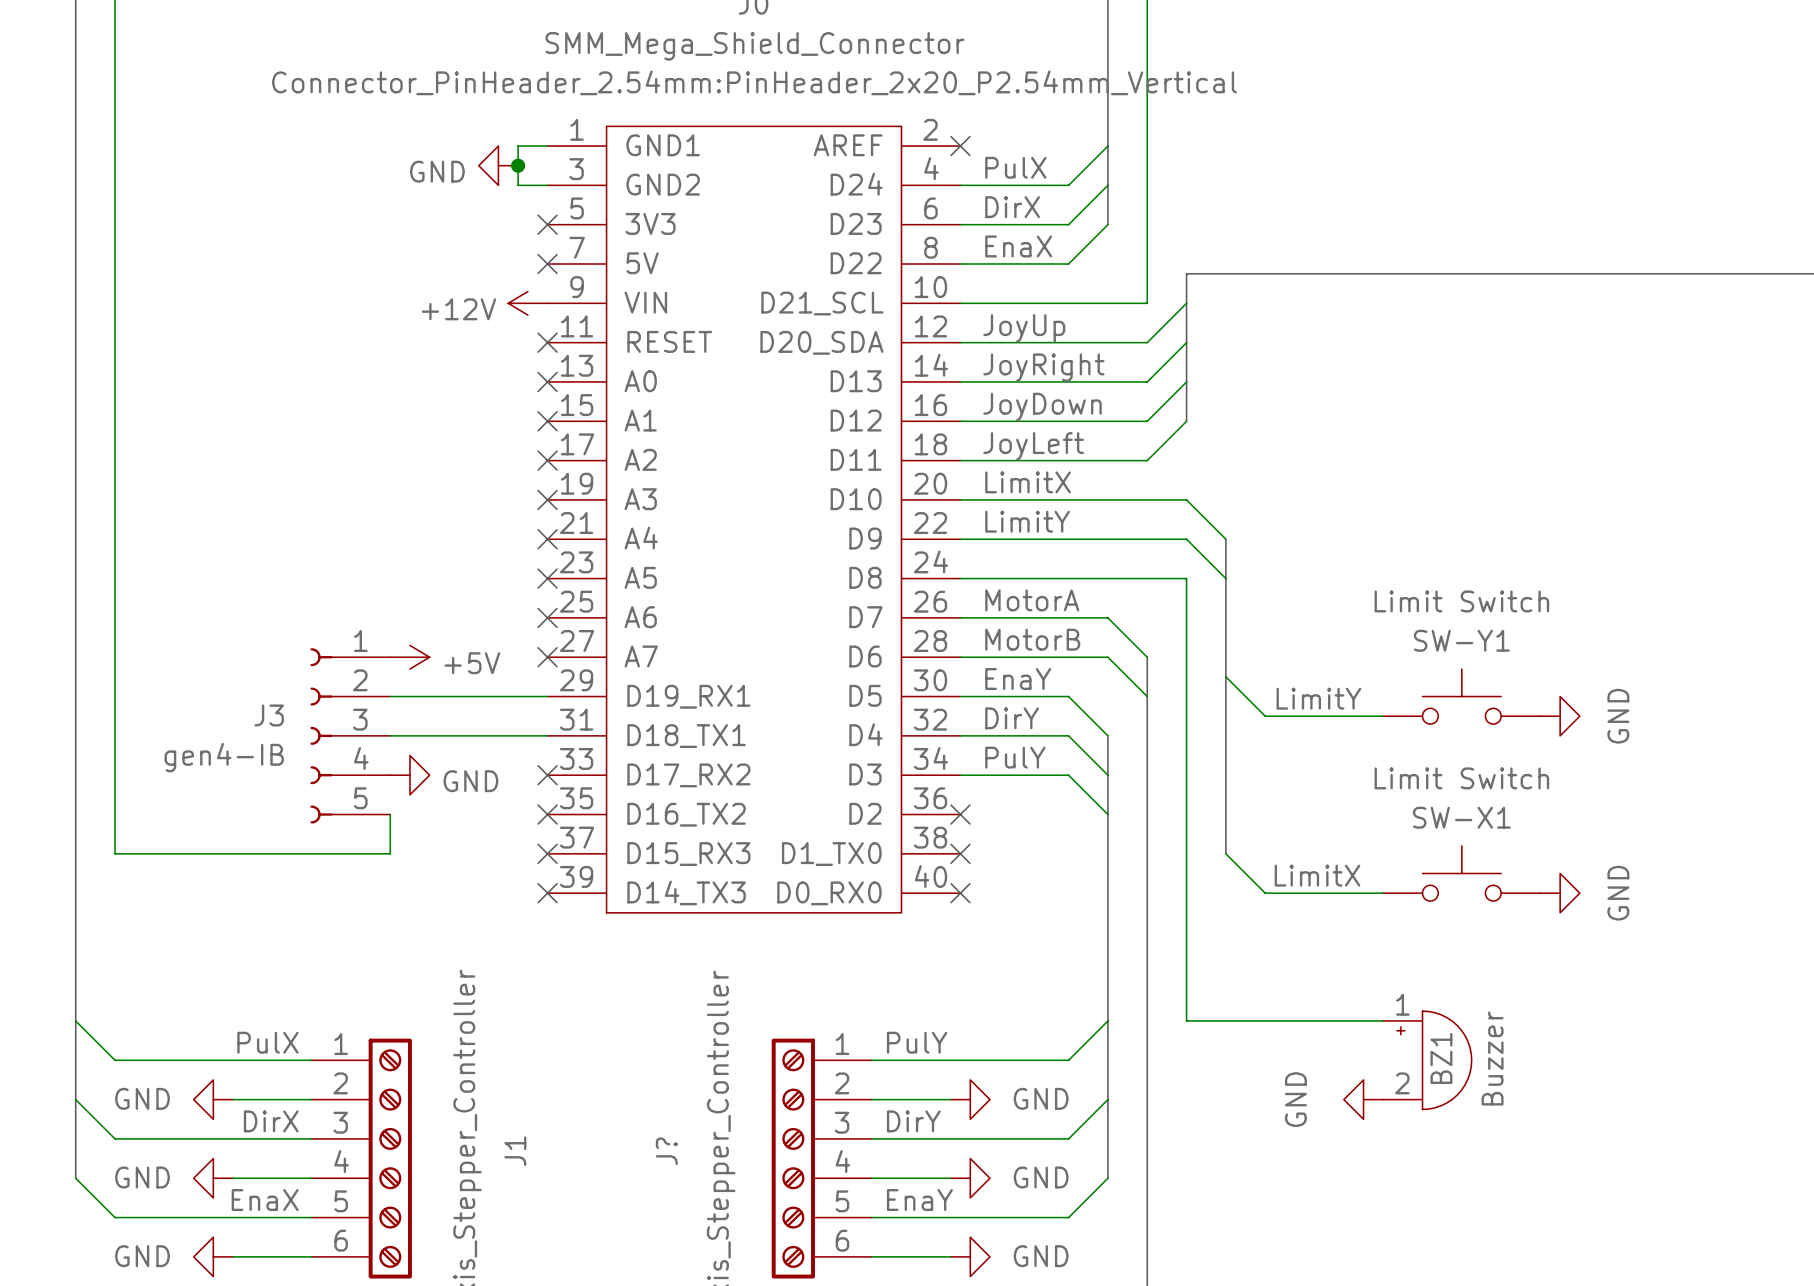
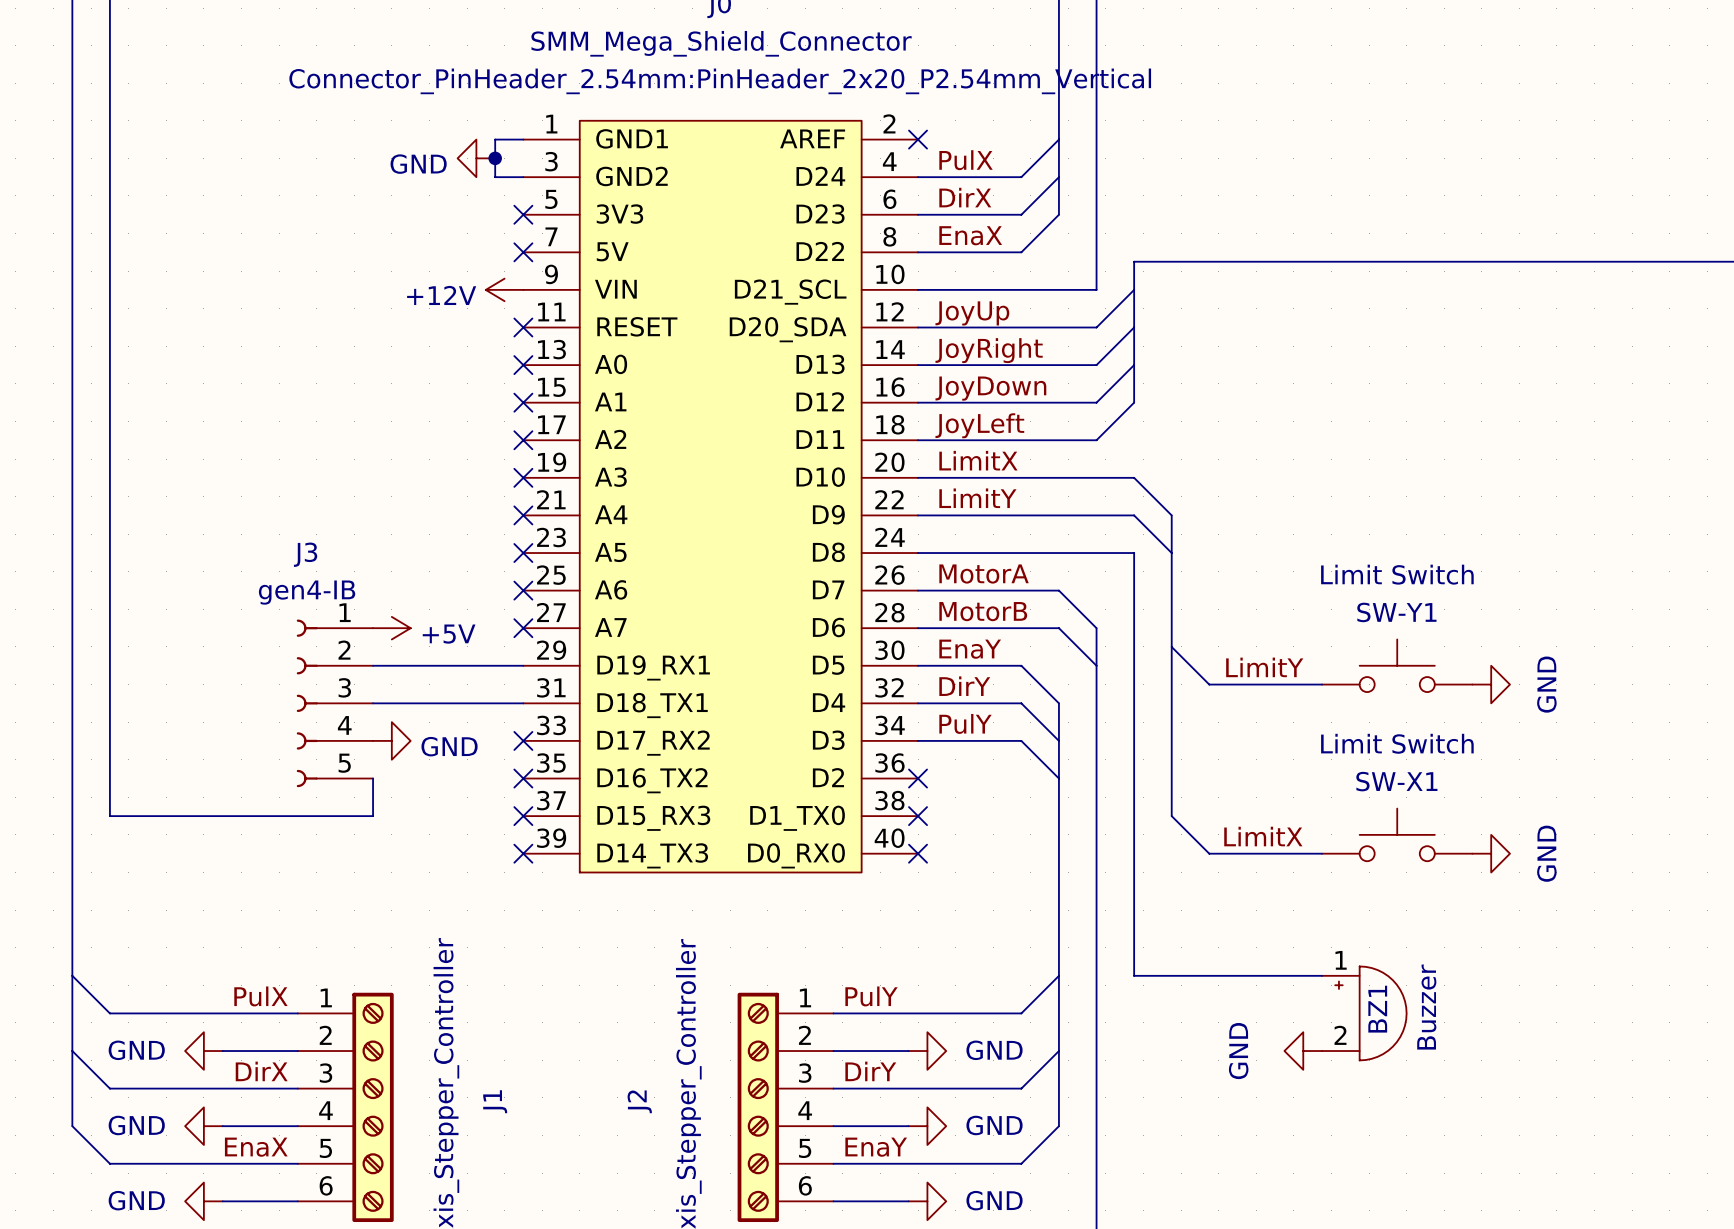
J3 name position: J3 (269, 715) -> J3 (305, 554)
J3 value position: gen4-IB (224, 757) -> gen4-IB (307, 592)
J? name: J? (666, 1151) -> J2 (639, 1101)

